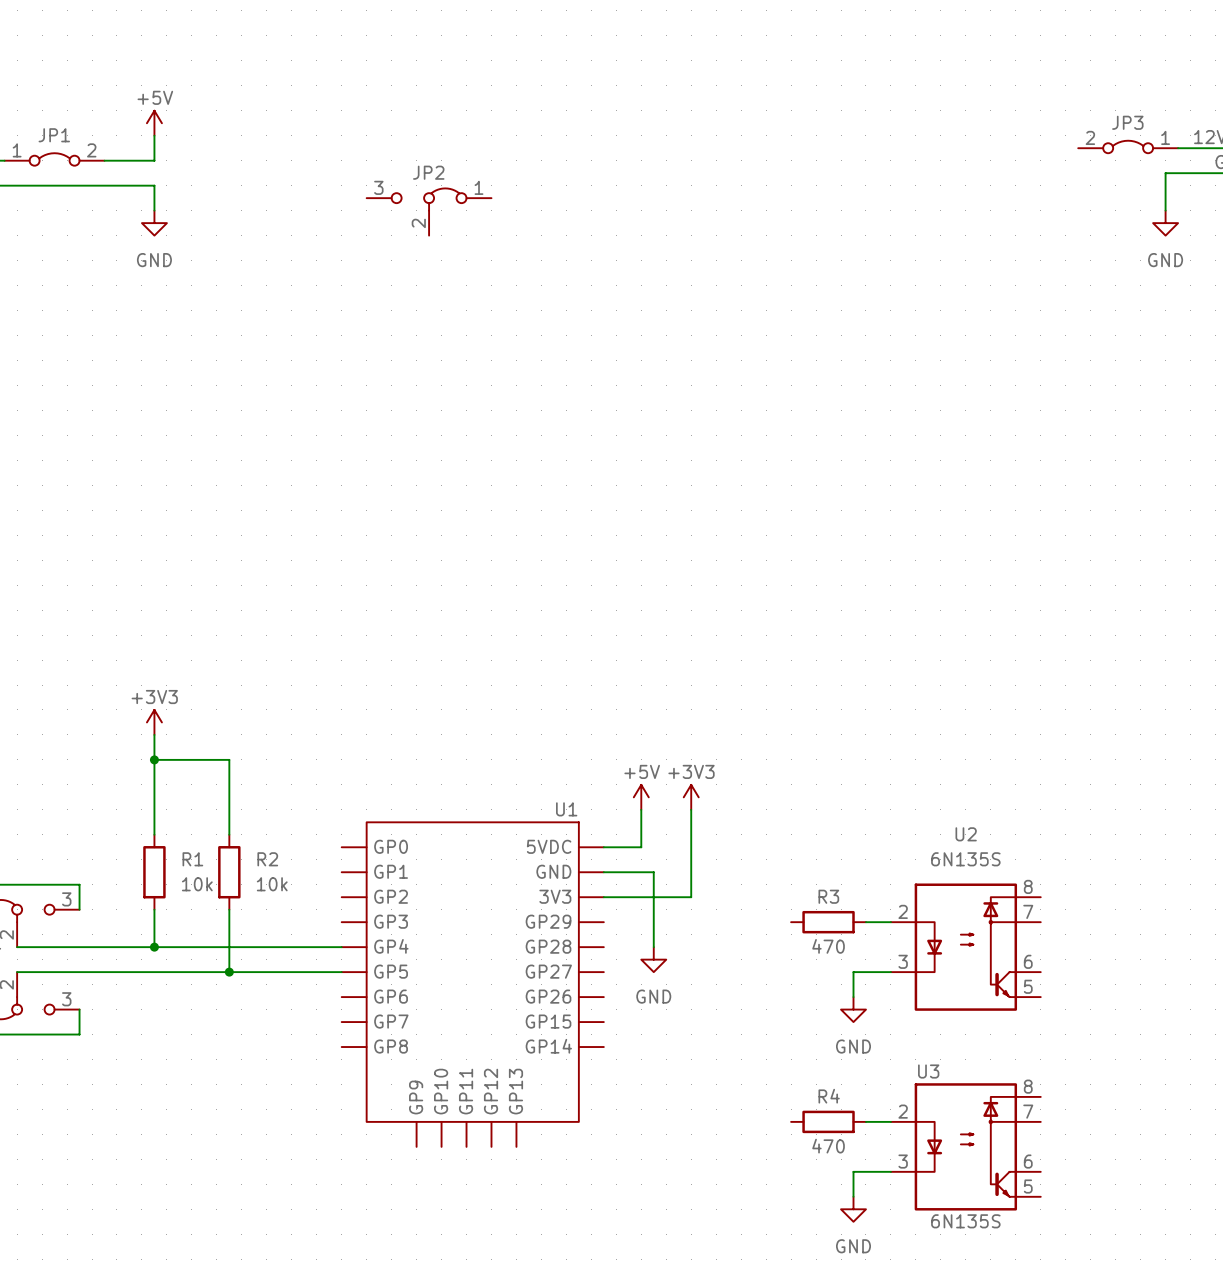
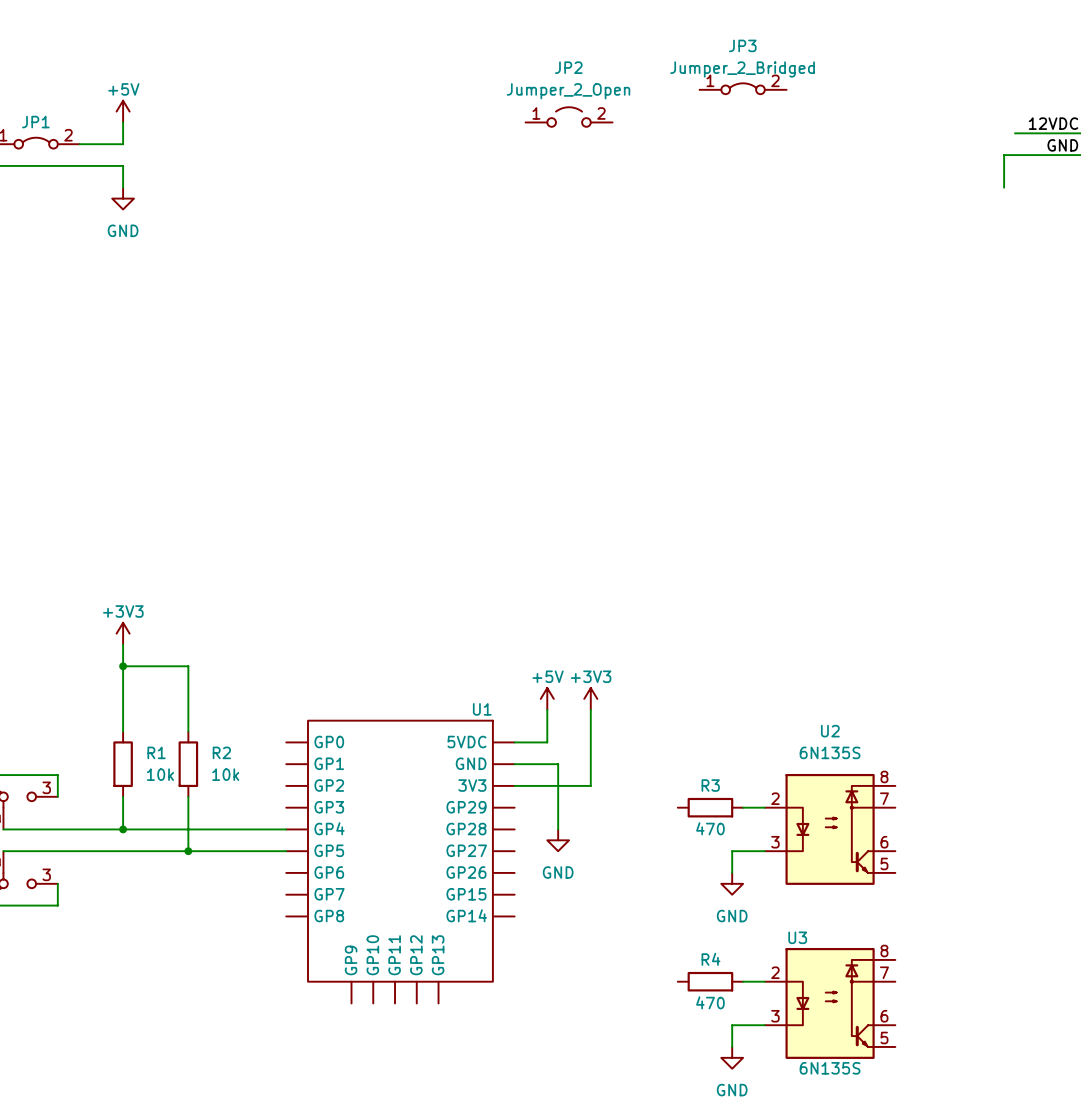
JP3 value: none -> Jumper_2_Bridged (742, 69)
JP2 value: none -> Jumper_2_Open (568, 91)
JP3 name position: JP3 (1127, 122) -> JP3 (742, 45)
JP3 flip: as is (1128, 146) -> left-right (743, 88)
JP3 position: (1128, 146) -> (743, 88)
JP2 symbol: [366, 188, 492, 236] -> [525, 107, 613, 127]
power symbol: GND (1165, 223) -> none

